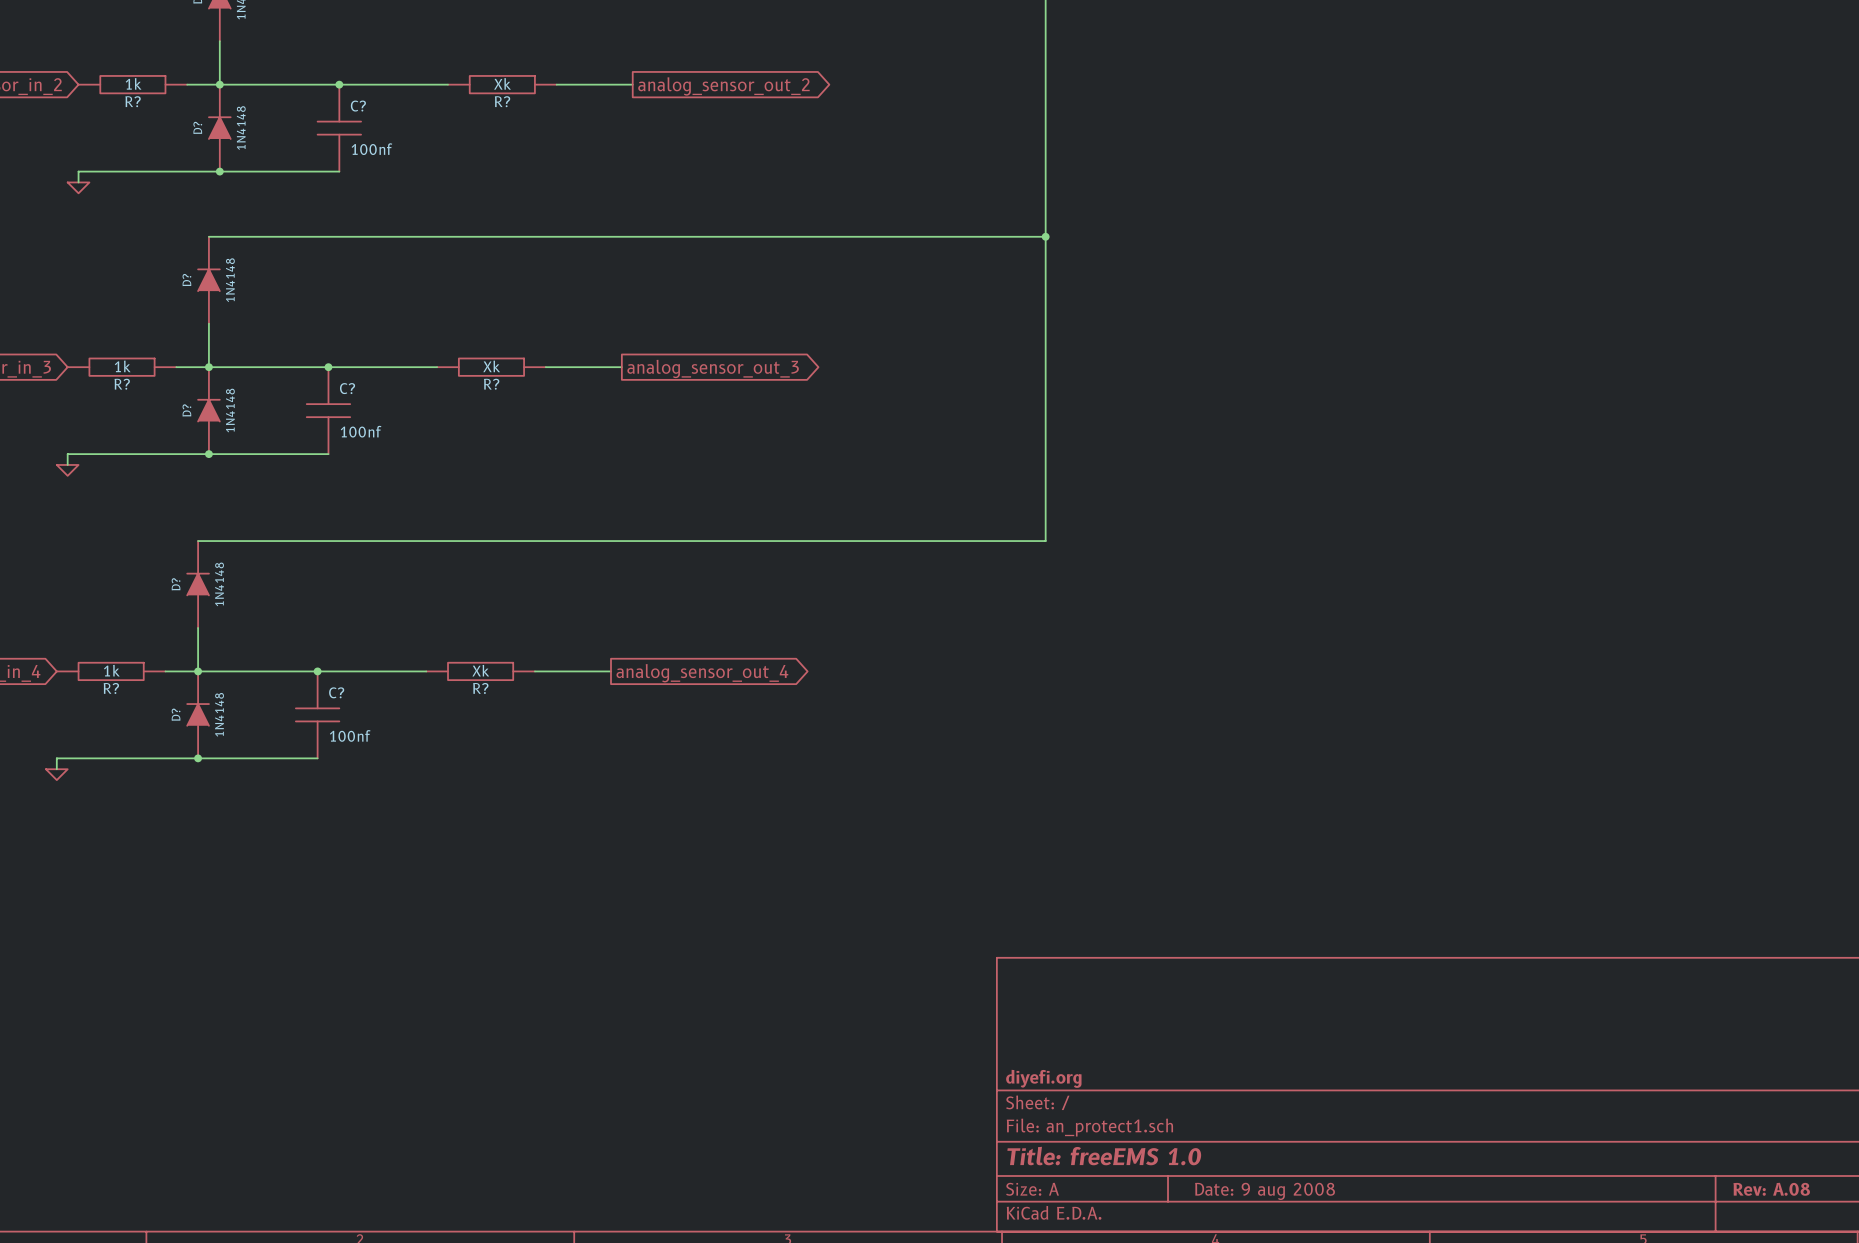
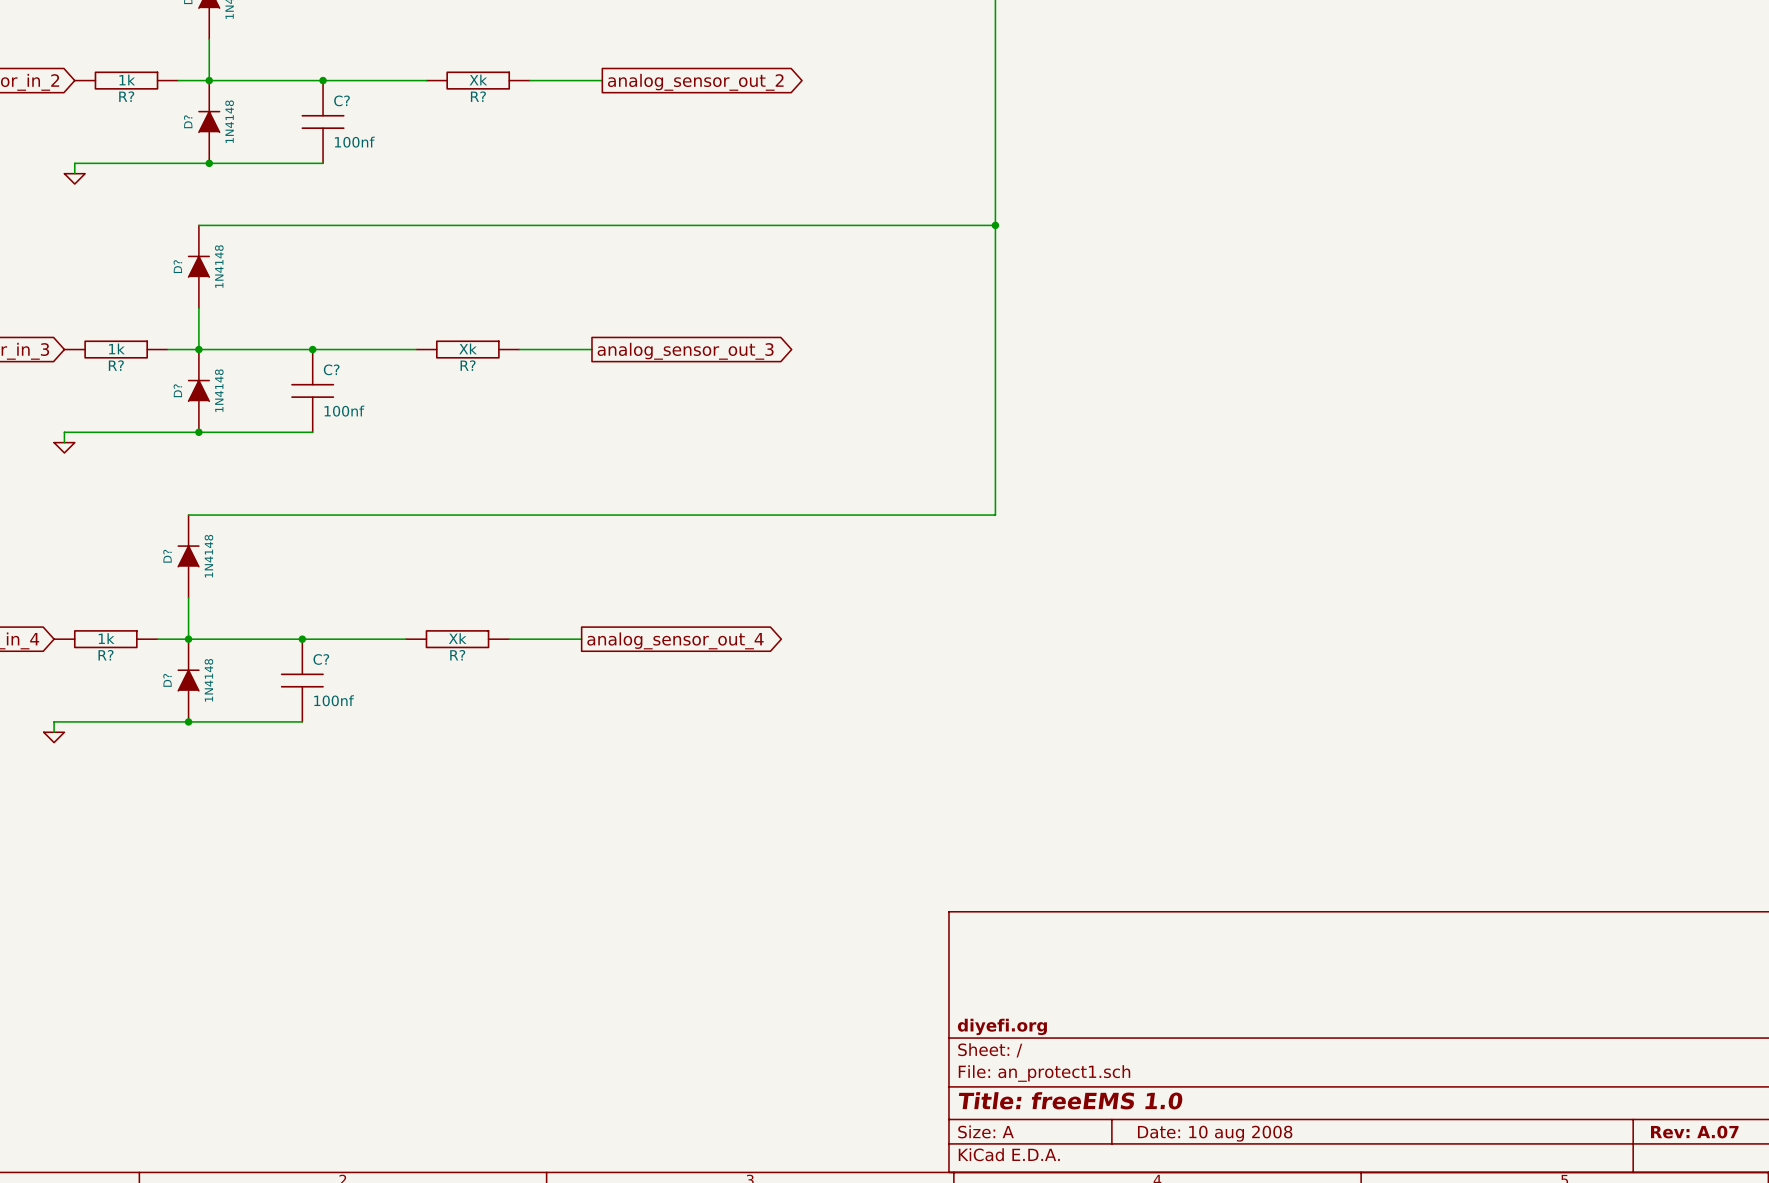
title block: Rev: A.08 (1771, 1189) -> Rev: A.07 (1694, 1132)
title block: Date: 9 aug 2008 (1265, 1191) -> Date: 10 aug 2008 (1215, 1133)

